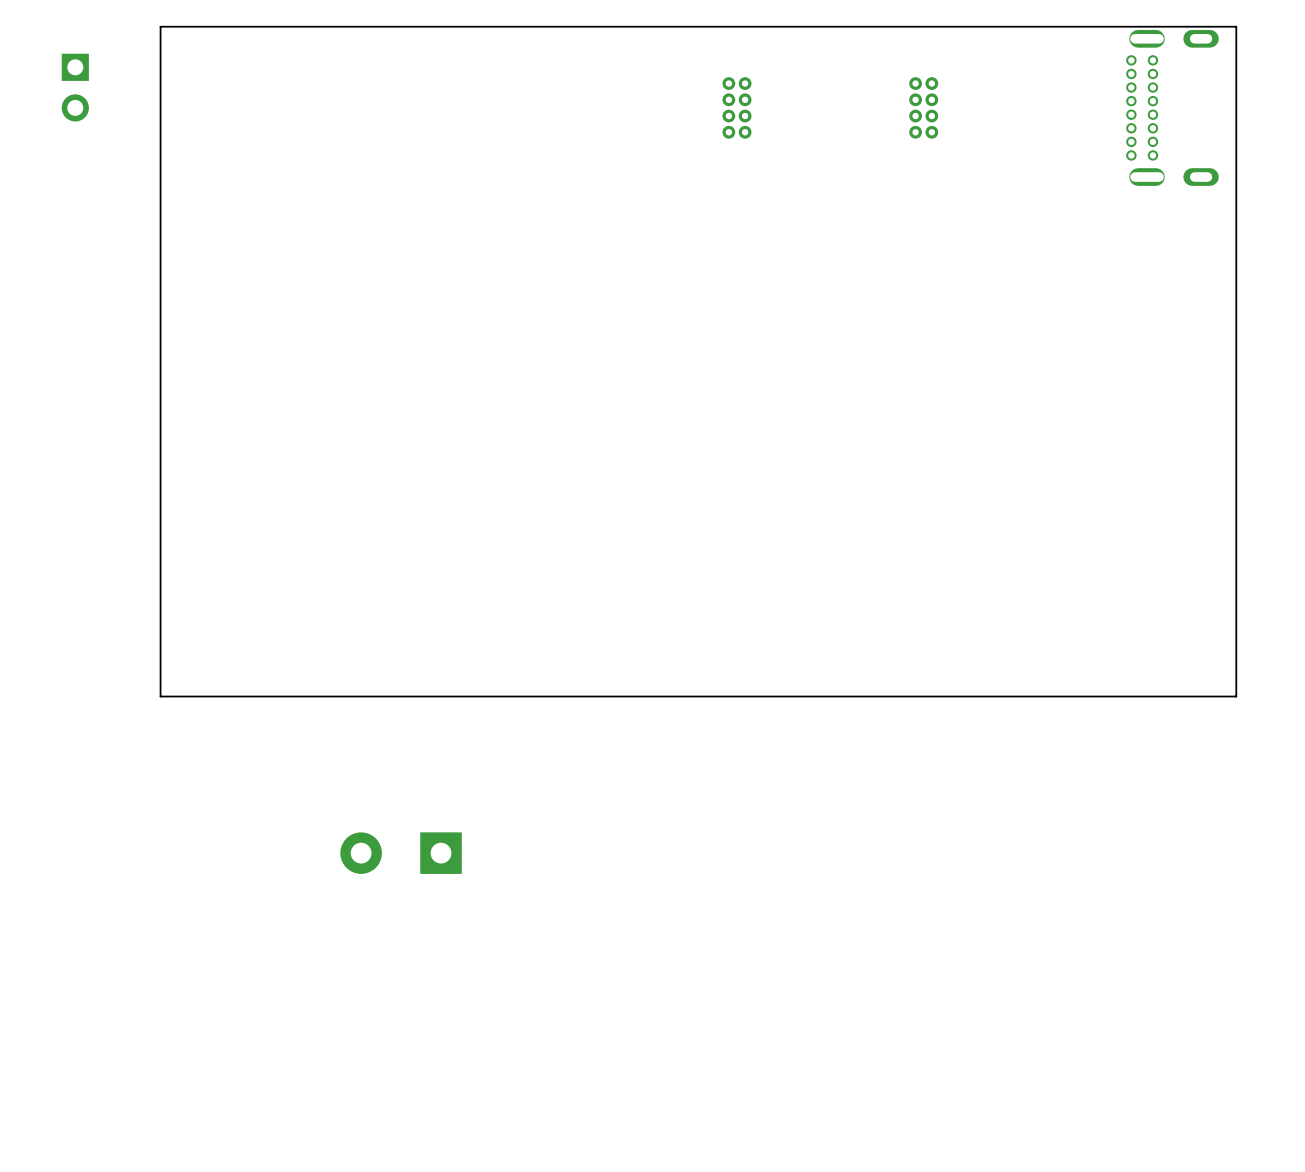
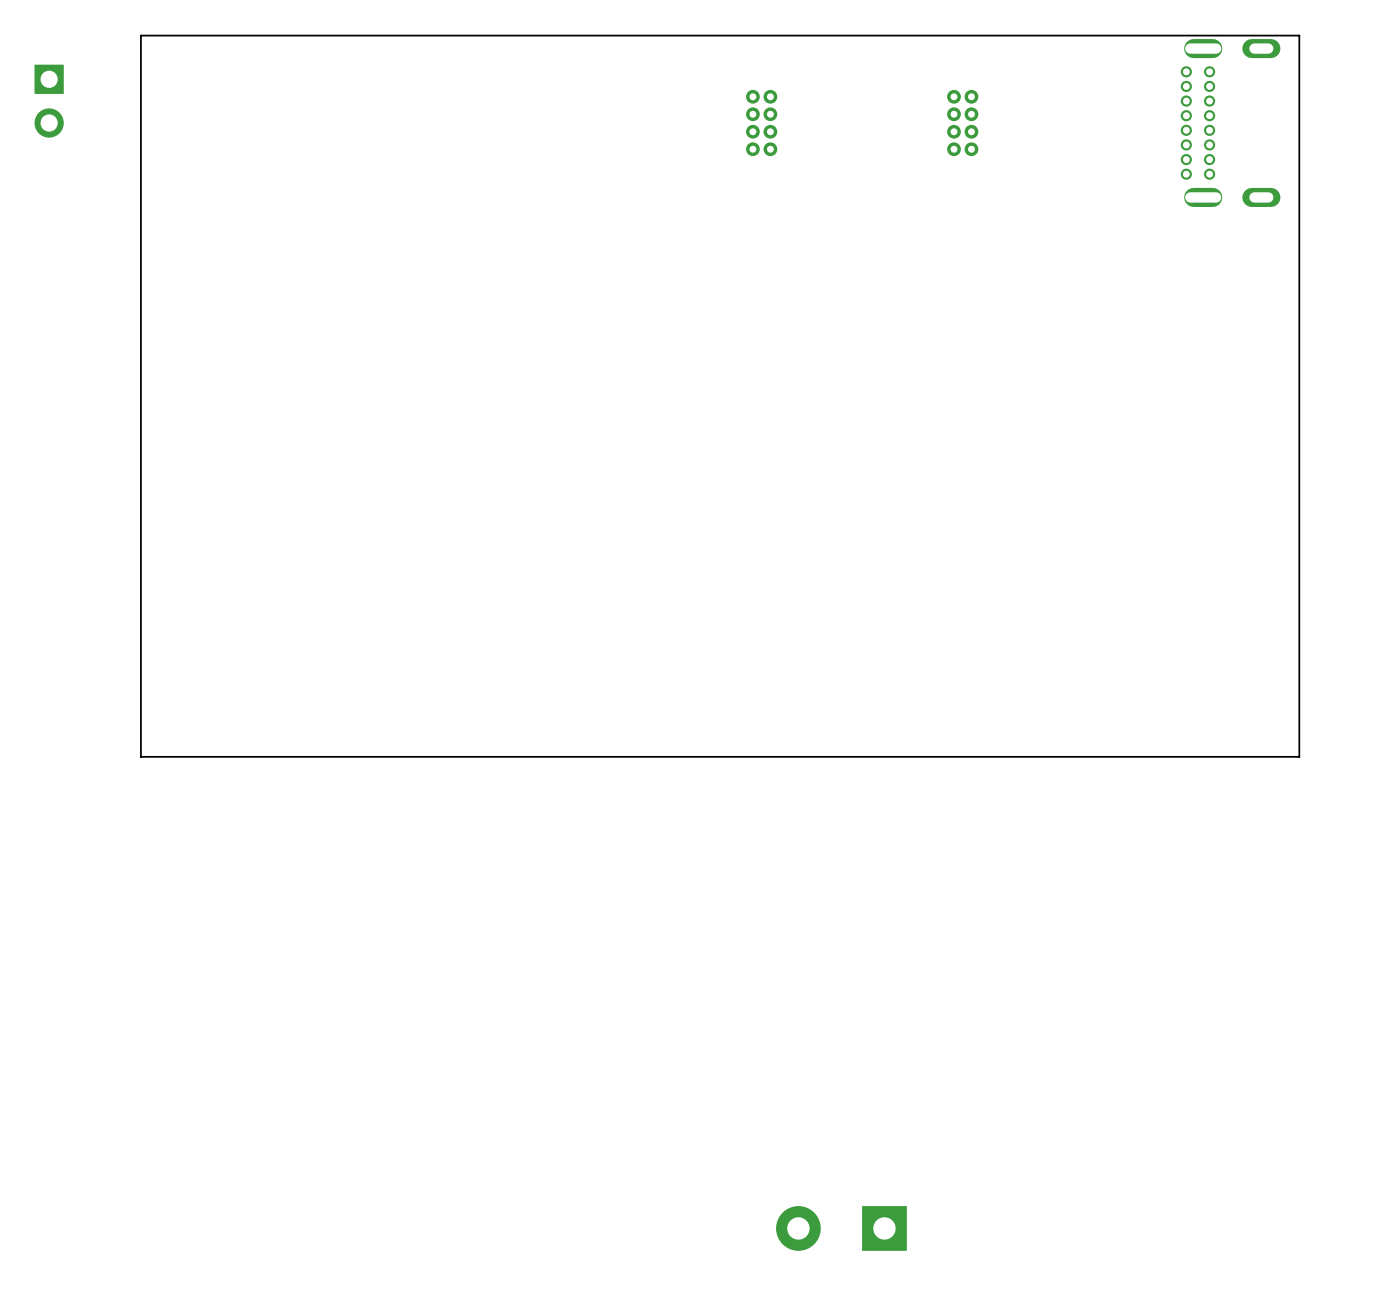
part: (401, 853) -> none
part: none -> (841, 1228)

